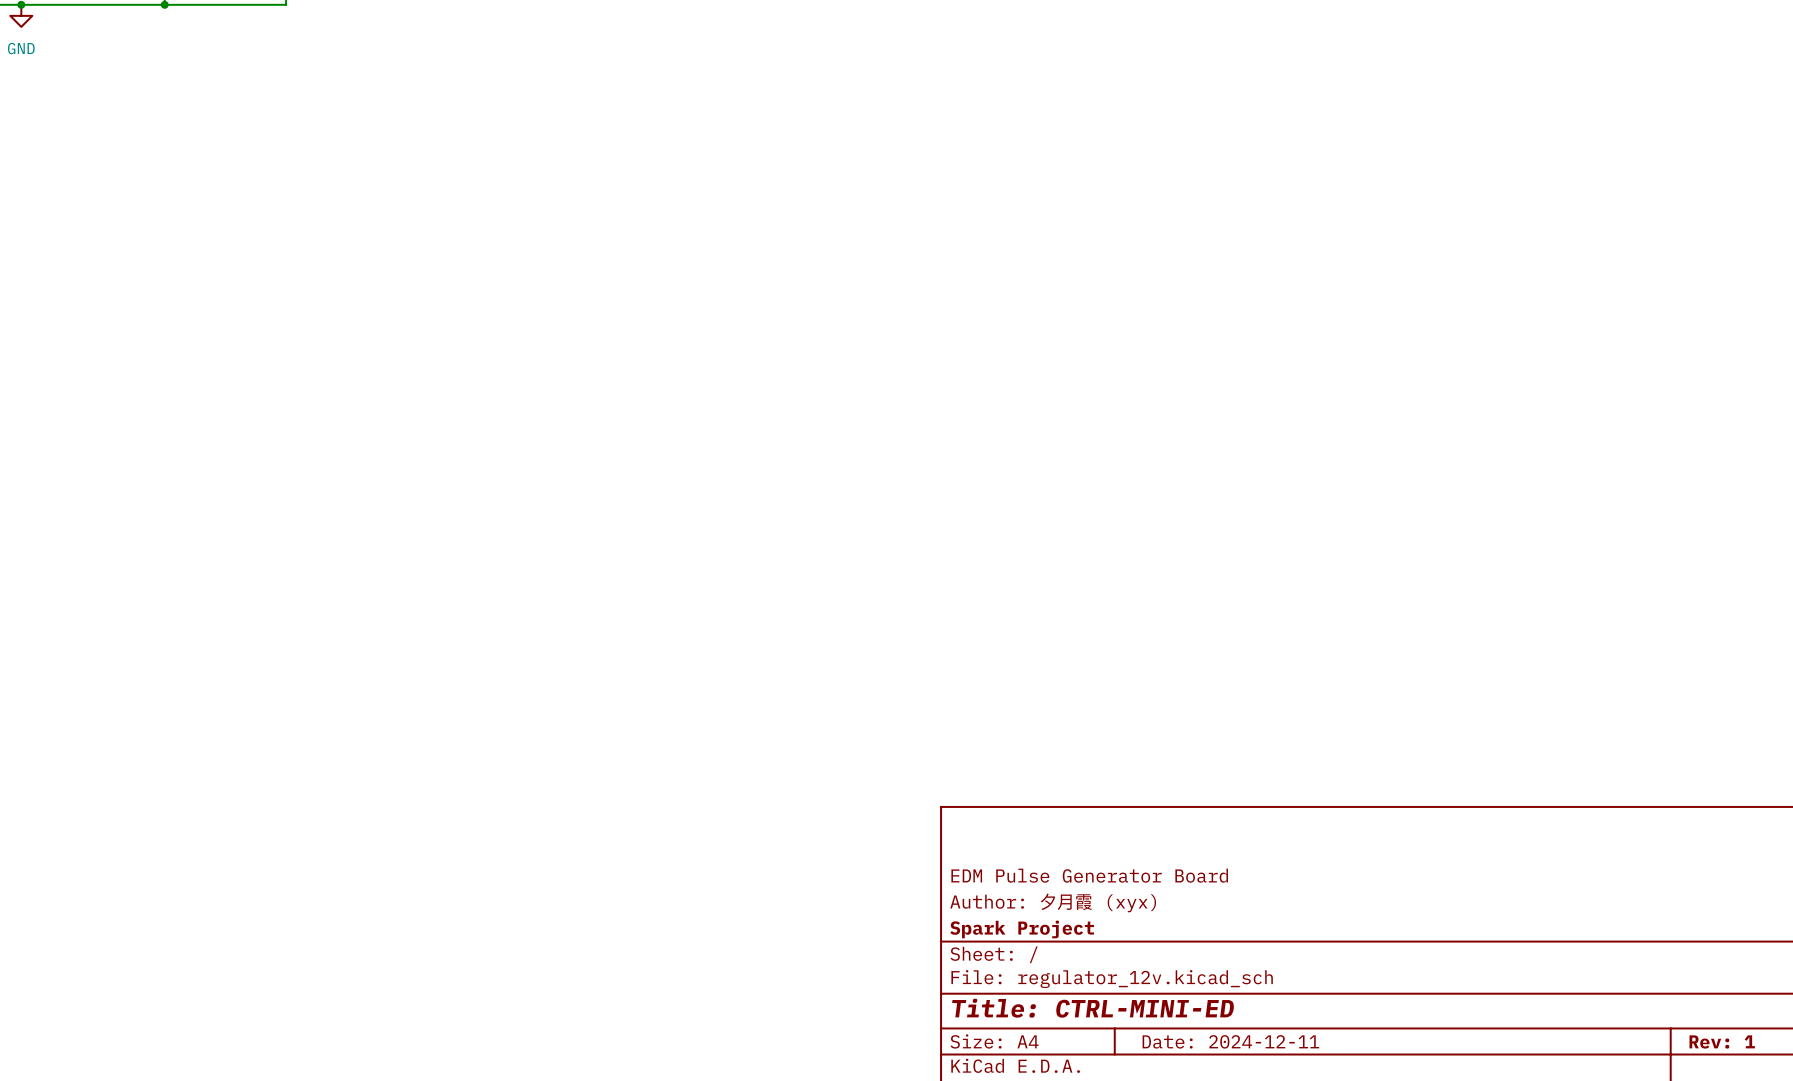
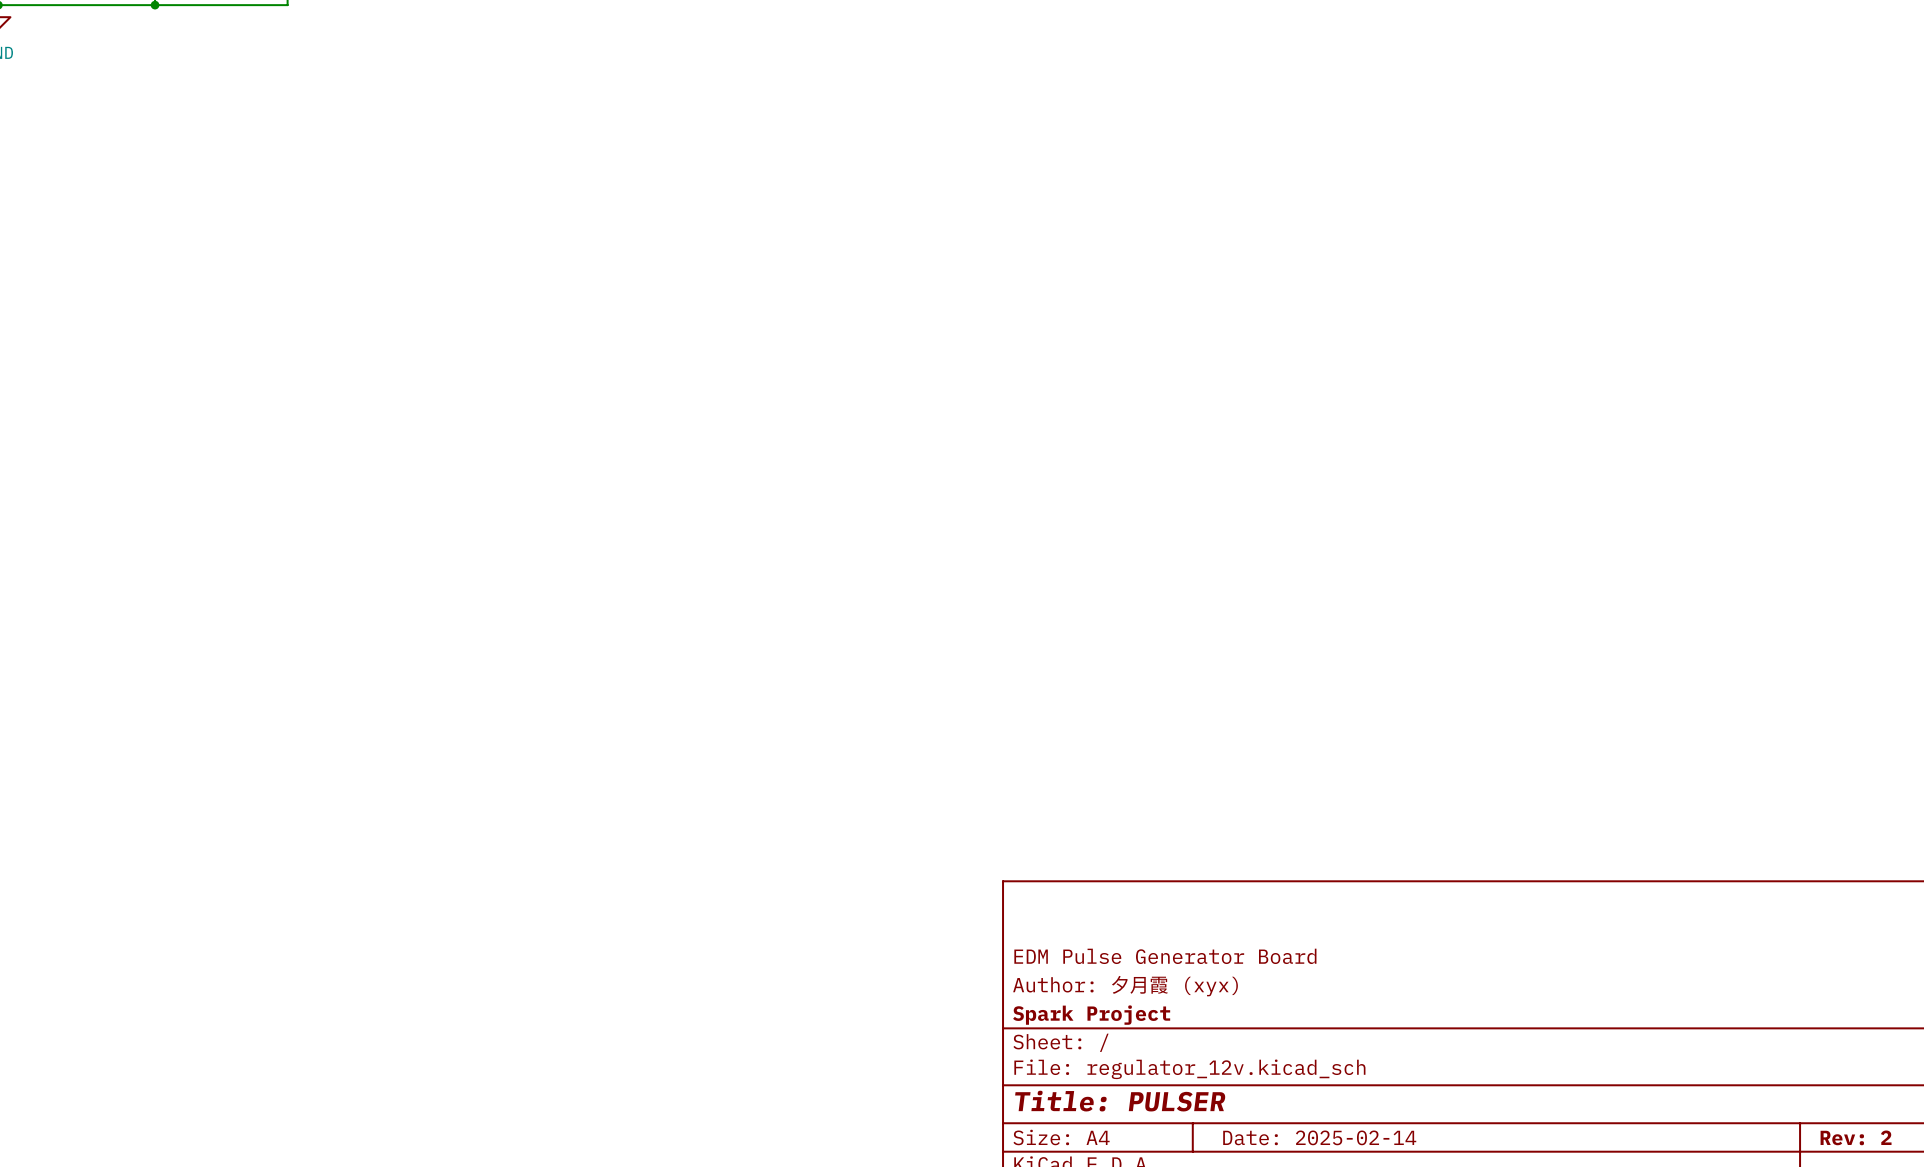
title block: Title: CTRL-MINI-ED (1093, 1008) -> Title: PULSER (1120, 1101)
title block: Date: 2024-12-11 (1230, 1041) -> Date: 2025-02-14 (1319, 1137)
title block: Rev: 1 (1722, 1041) -> Rev: 2 (1856, 1137)

